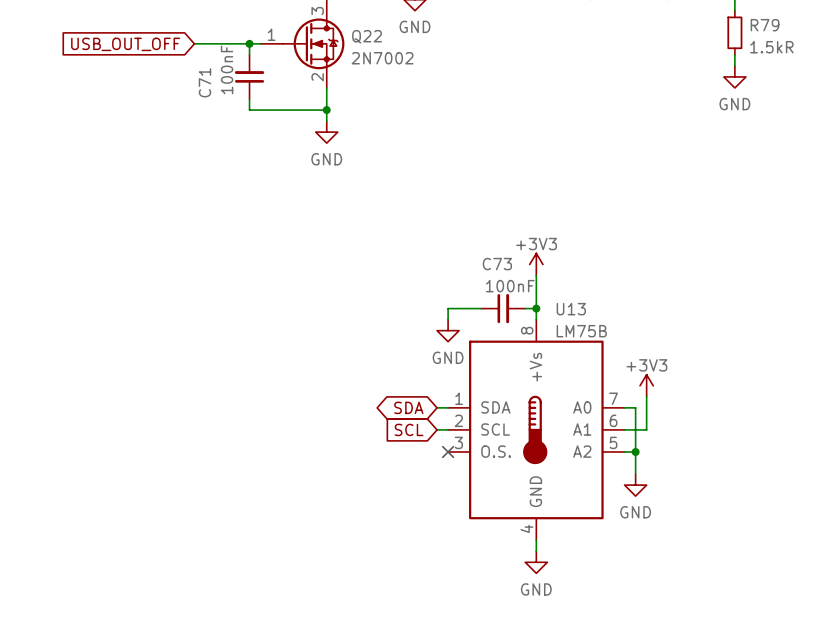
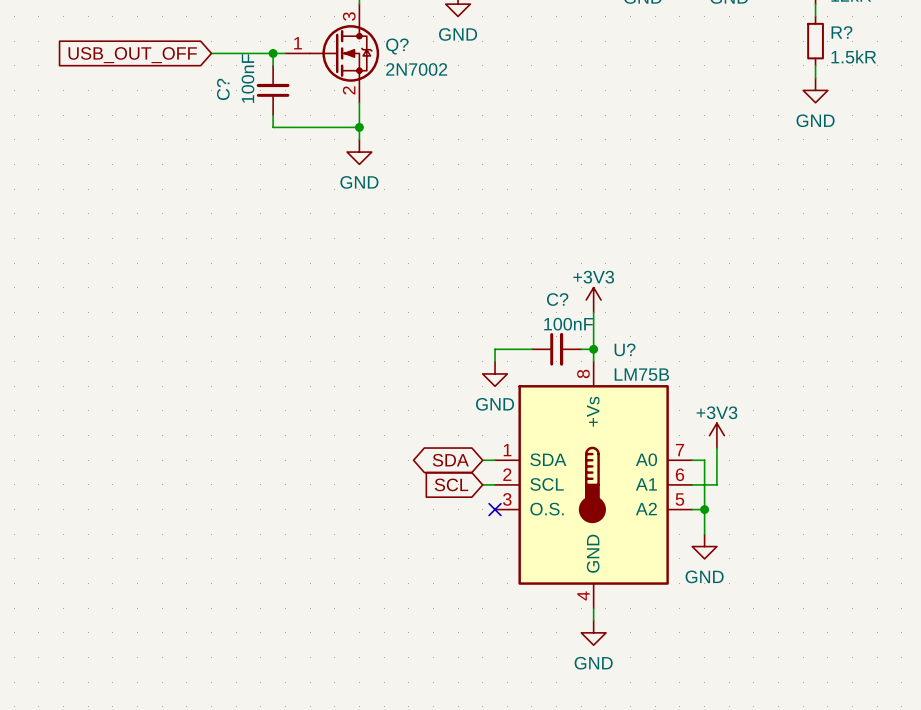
R79 name: R79 (765, 25) -> R? (841, 32)
Q22 name: Q22 (367, 36) -> Q? (397, 46)
C71 name: C71 (204, 82) -> C? (223, 89)
C73 name: C73 (497, 264) -> C? (557, 299)
U13 name: U13 (571, 309) -> U? (625, 349)

